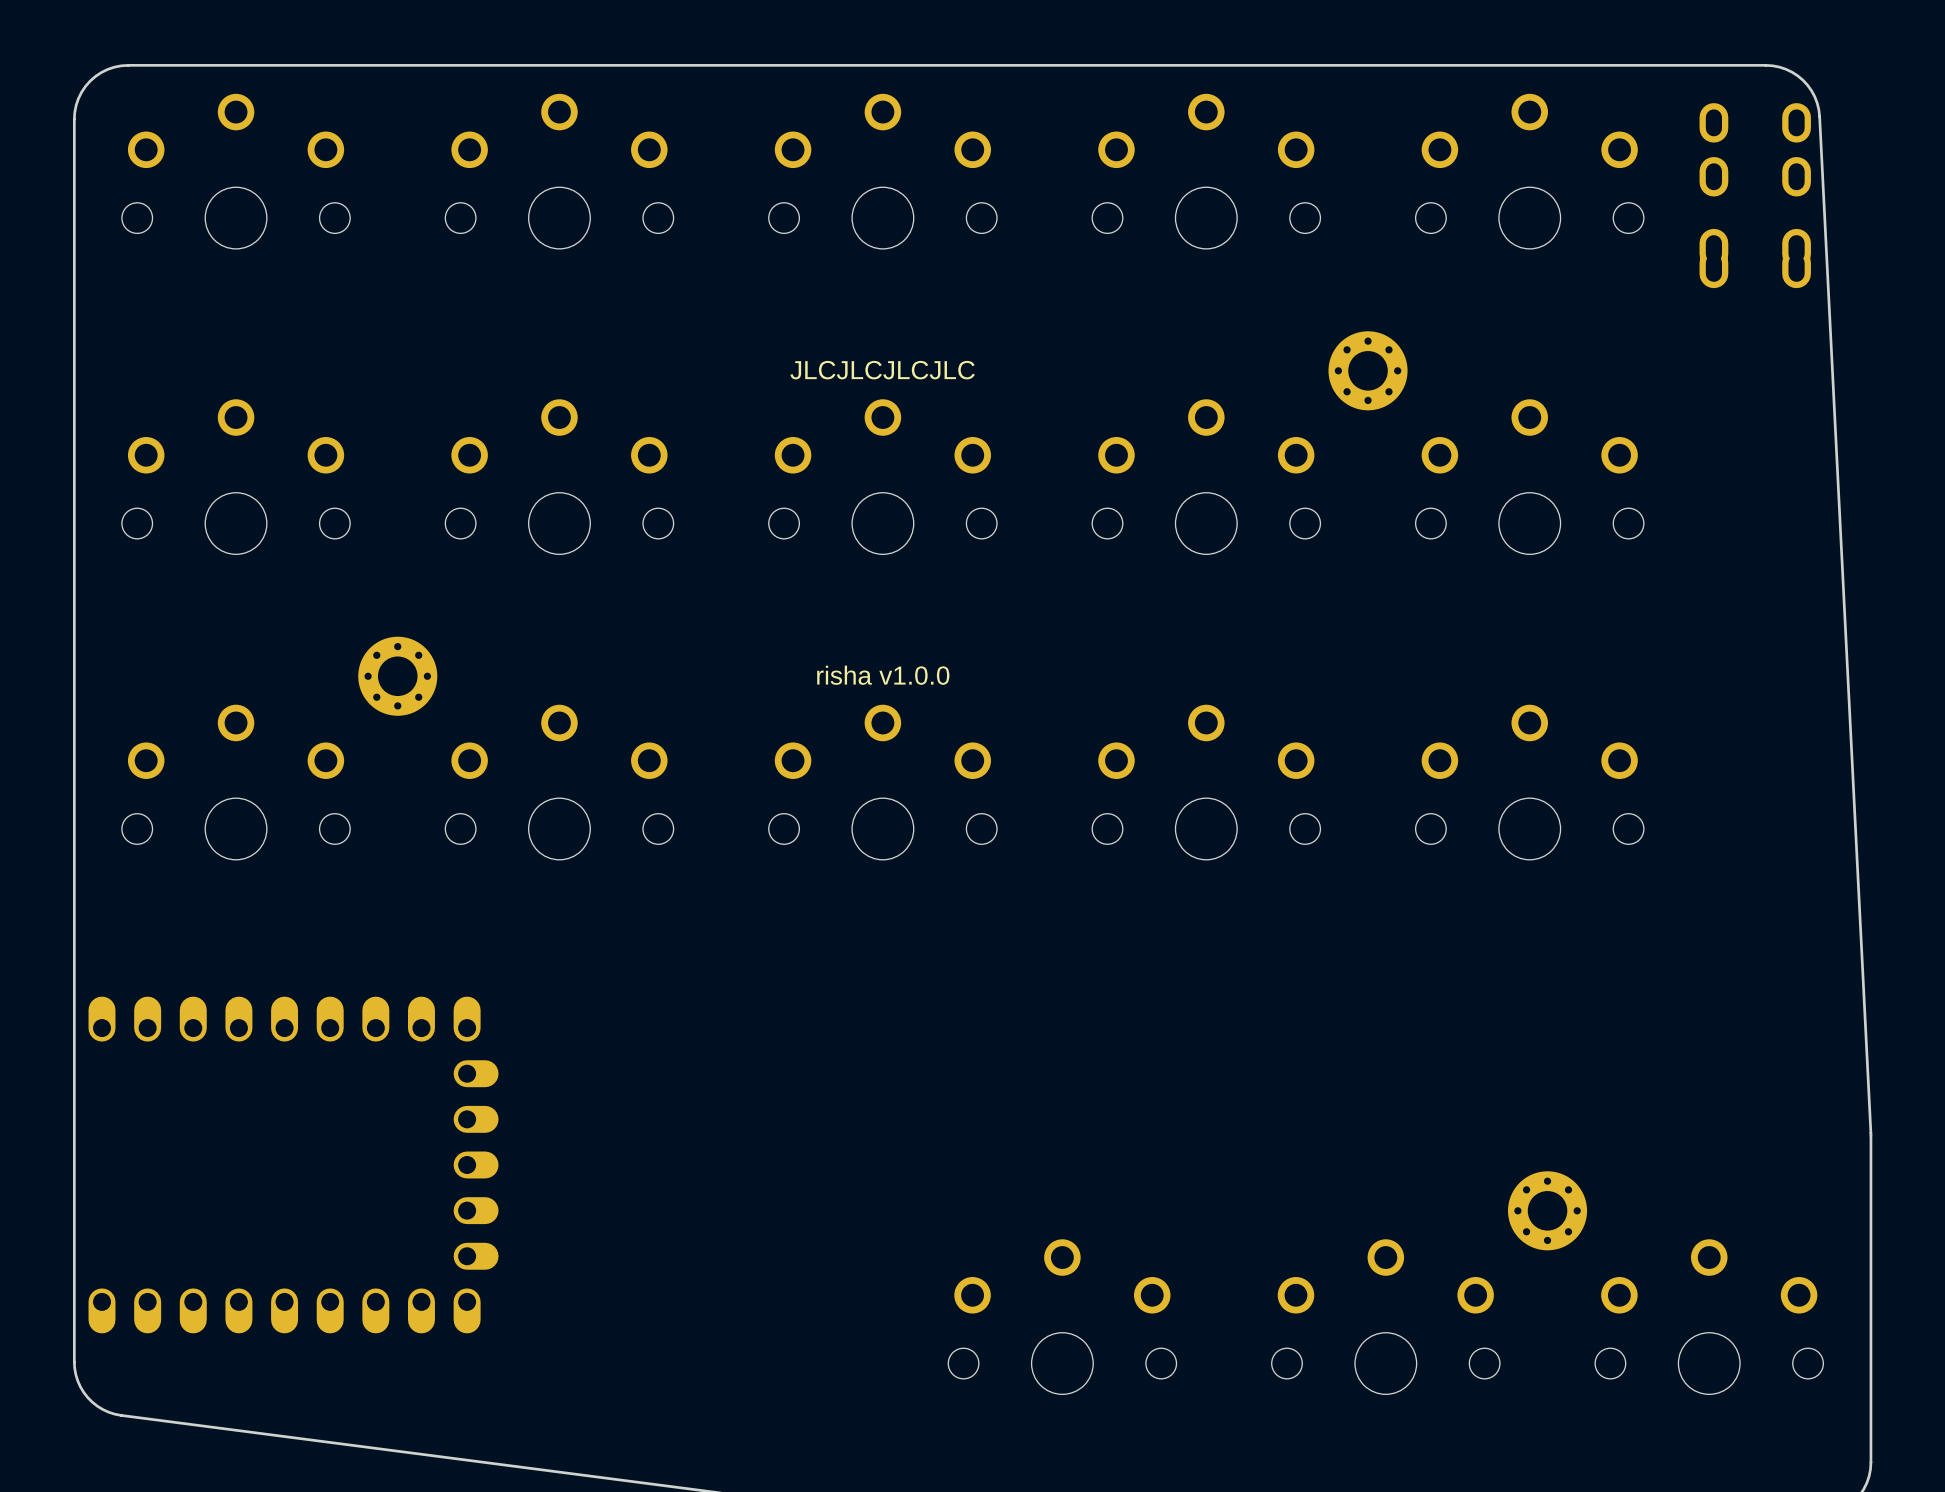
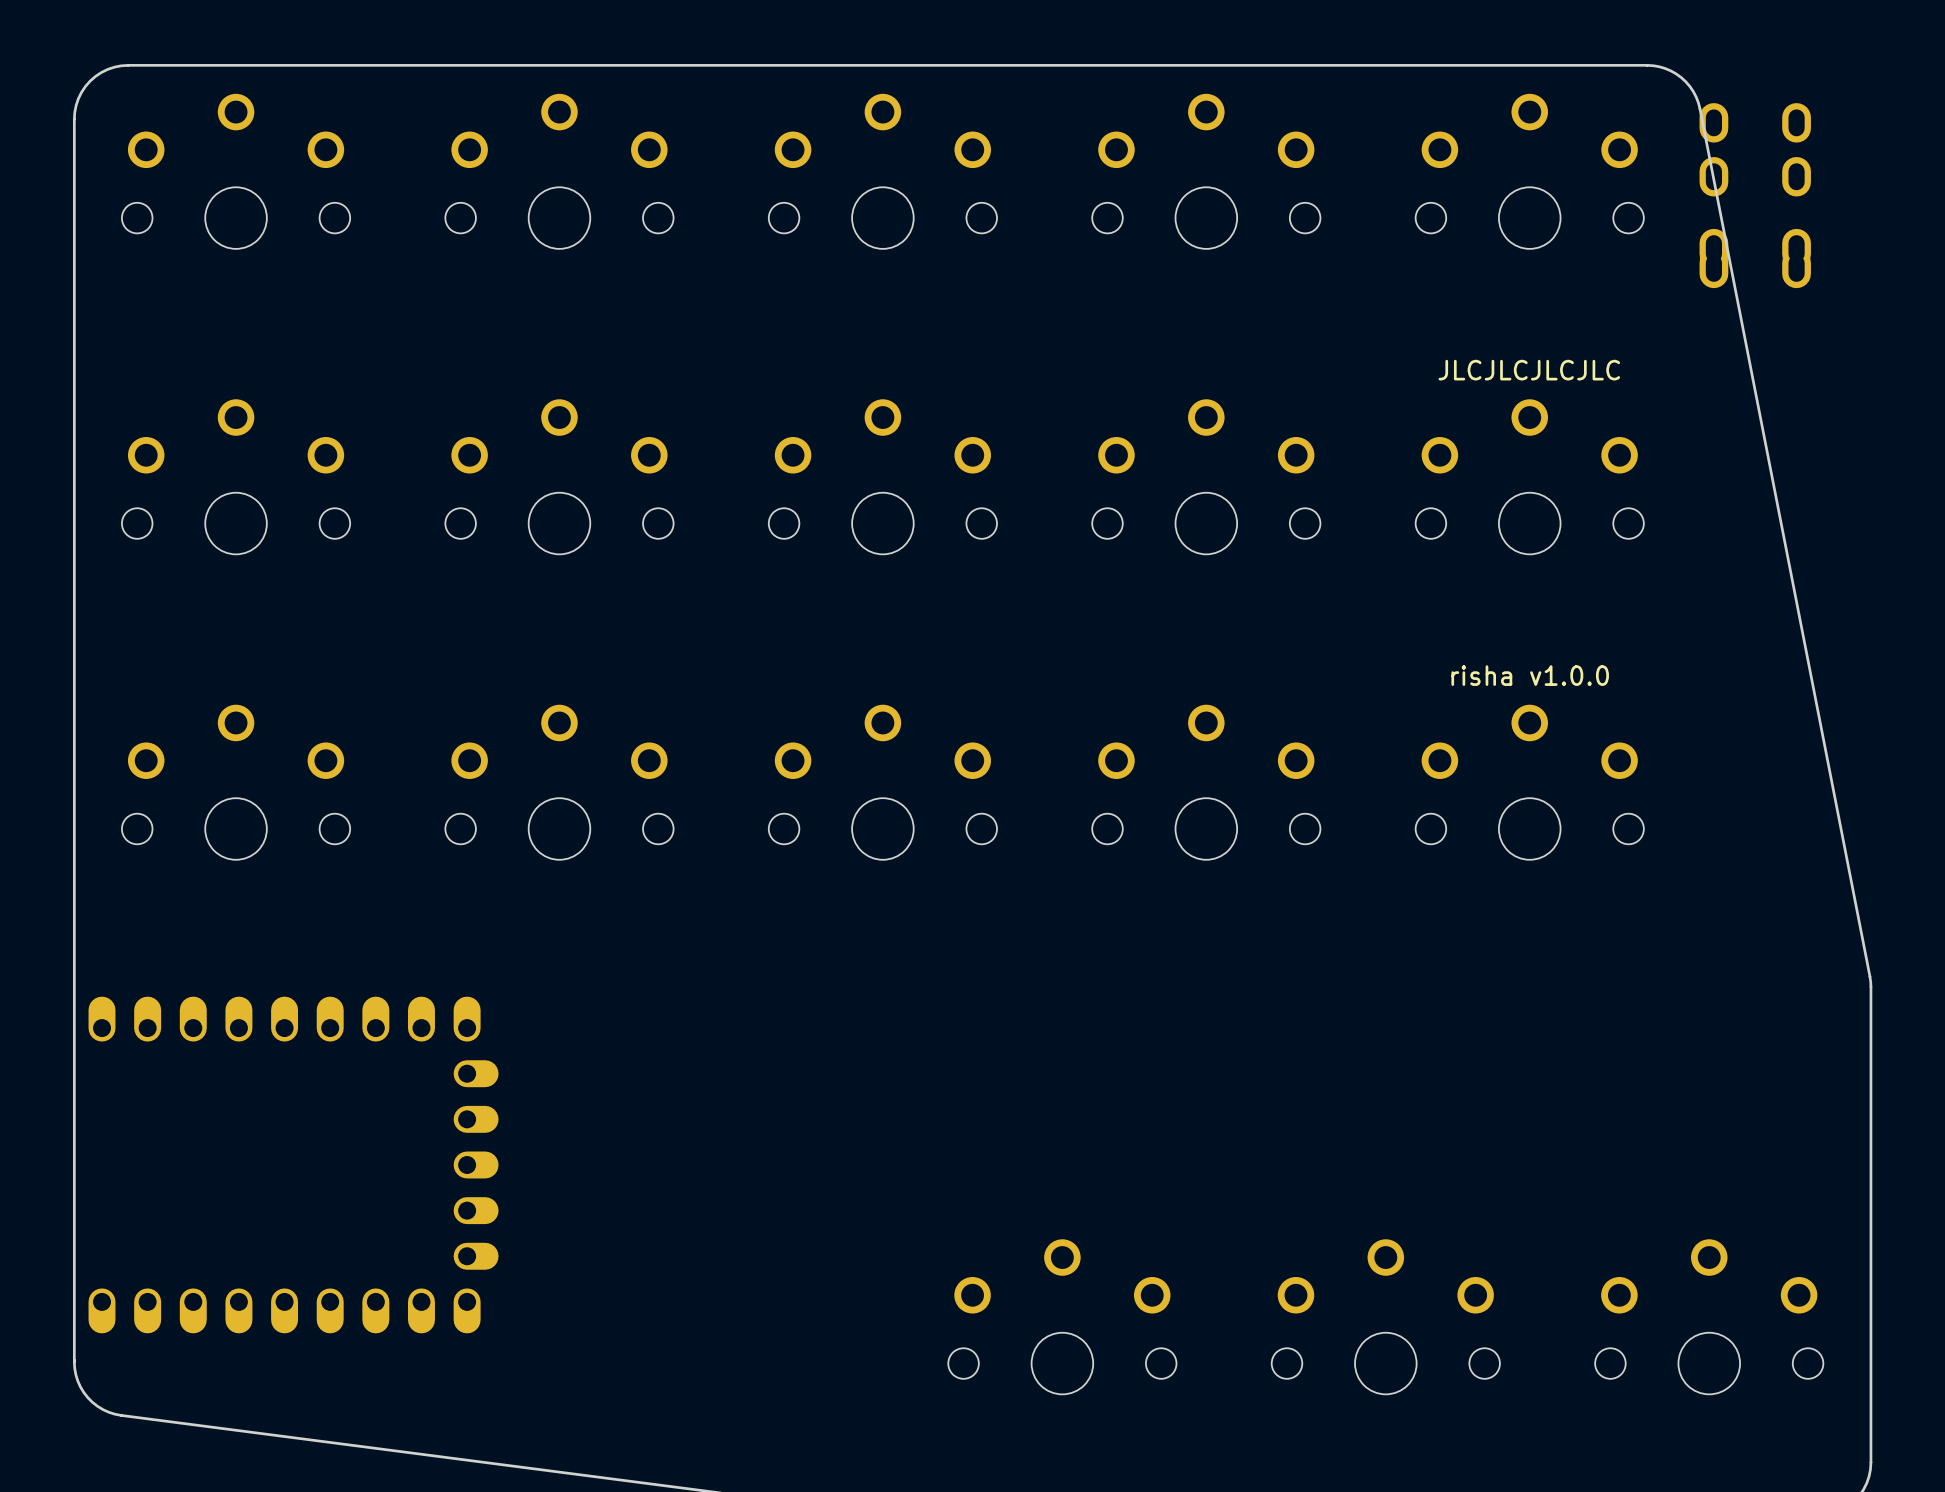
board edge: (1647, 65) (1765, 65) (1779, 67) (1791, 72) (1802, 80) (1811, 90) (1818, 109) (1870, 1135) -> (1647, 65) (1665, 68) (1681, 77) (1693, 91) (1699, 108) (1869, 976) (1870, 1135)
text: JLCJLCJLCJLC (882, 370) -> none
part: (1368, 370) -> none
text: none -> JLCJLCJLCJLC (1529, 370)
text: risha v1.0.0 (883, 675) -> none
text: none -> risha v1.0.0 (1530, 675)
part: (397, 676) -> none
part: (1547, 1210) -> none

